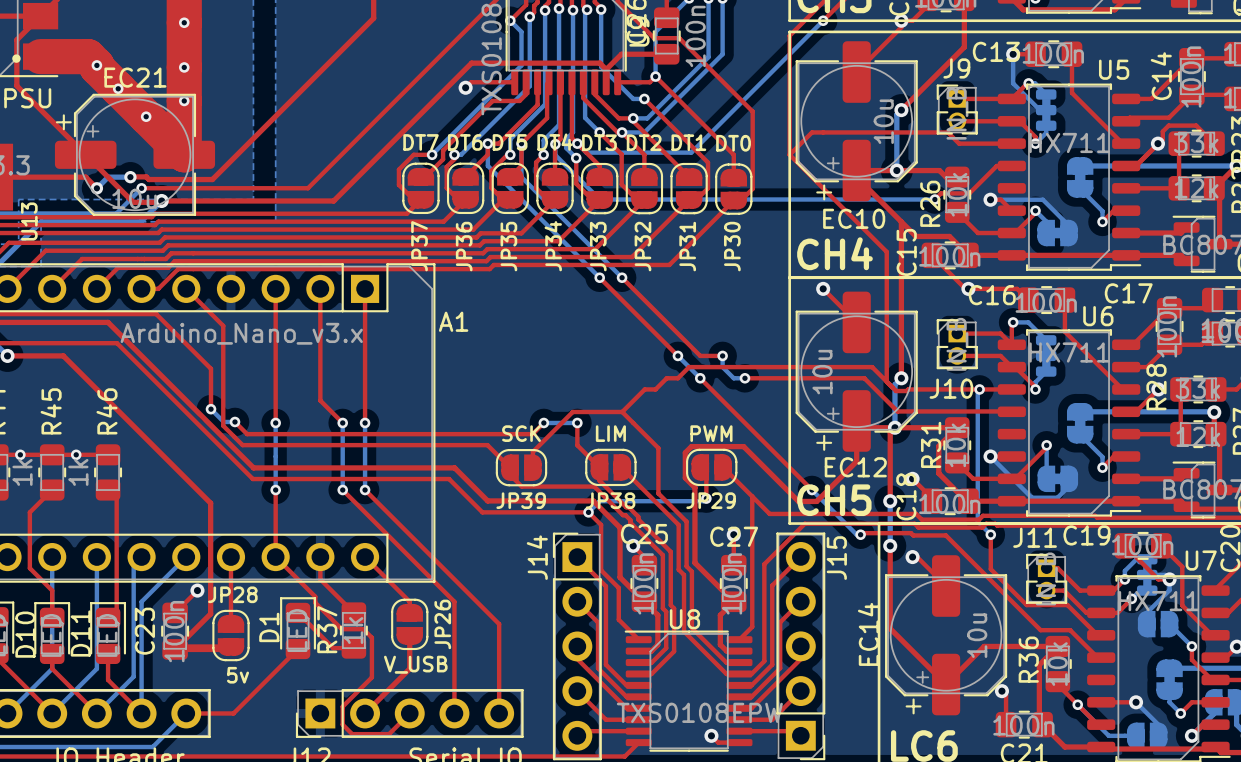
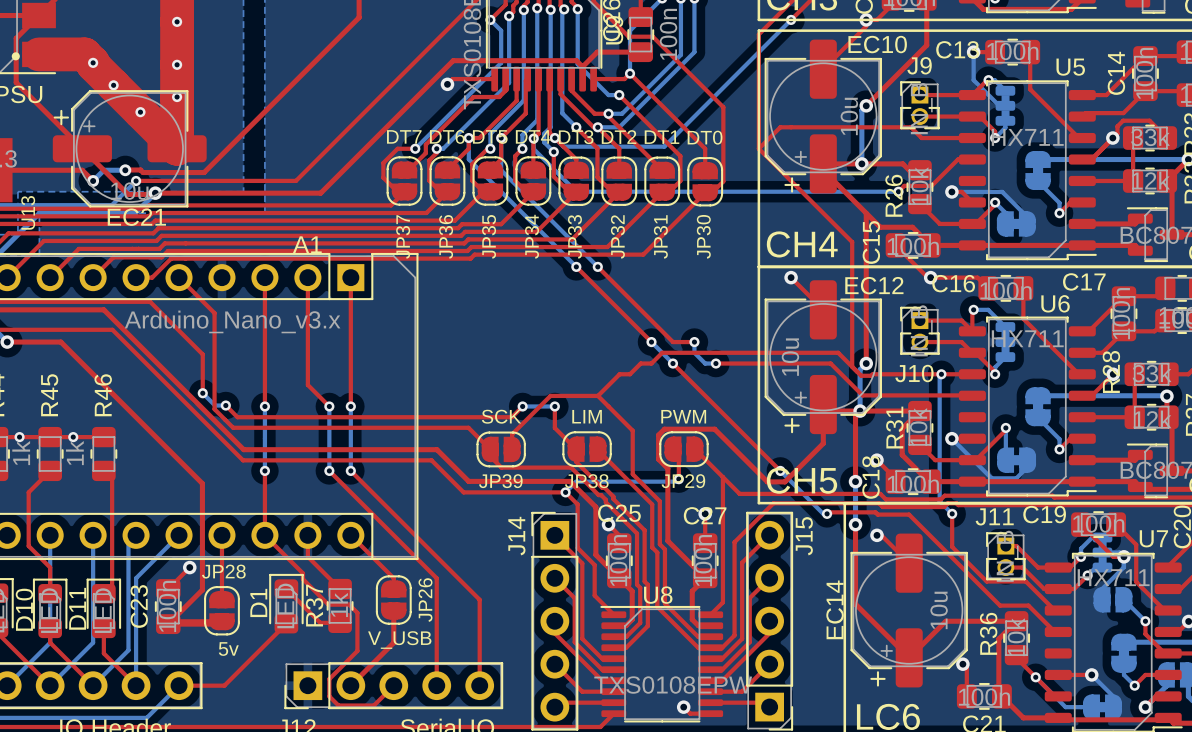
EC21 name position: EC21 (135, 77) -> EC21 (136, 217)
EC10 name position: EC10 (854, 218) -> EC10 (877, 44)
A1 name position: A1 (453, 321) -> A1 (307, 244)
EC12 name position: EC12 (855, 467) -> EC12 (874, 285)
part footprint: [1126, 722, 1168, 750] -> [1083, 694, 1122, 720]

